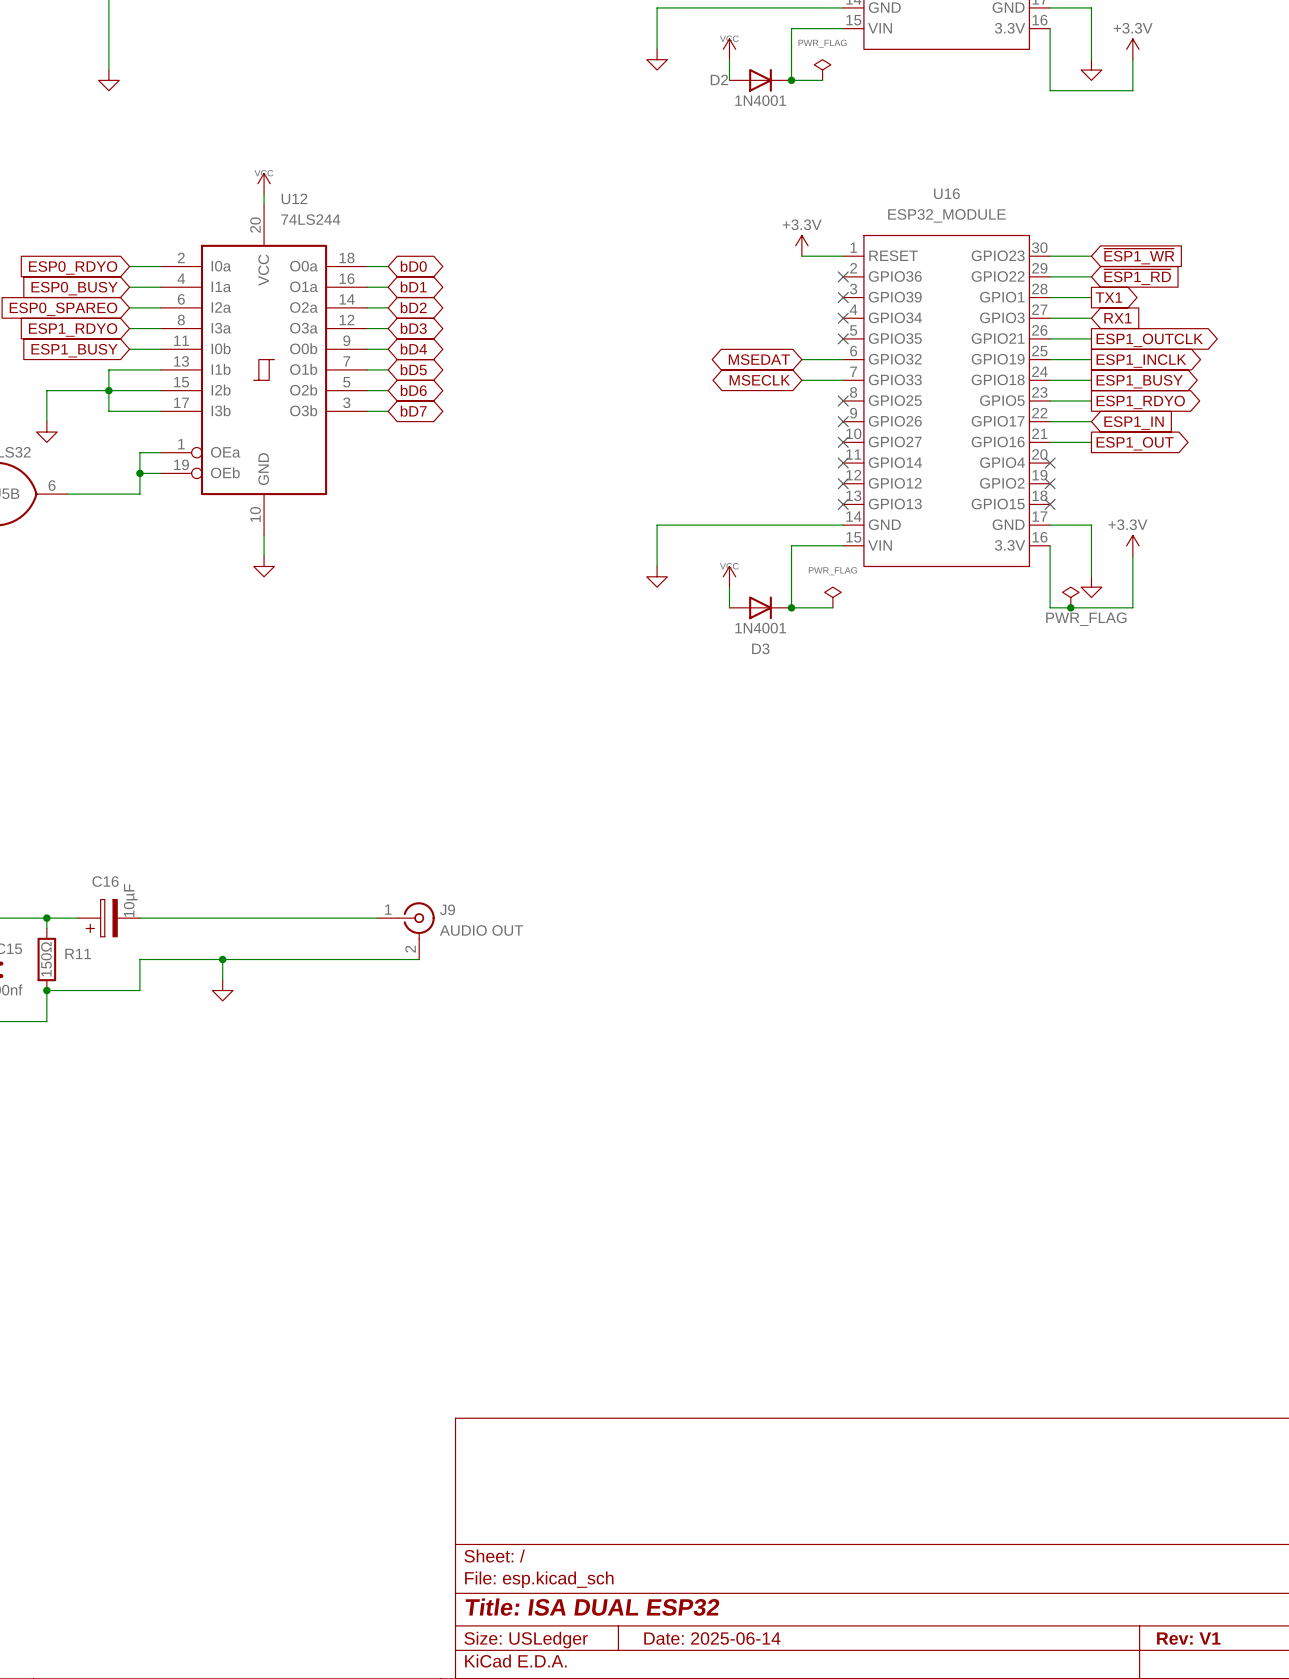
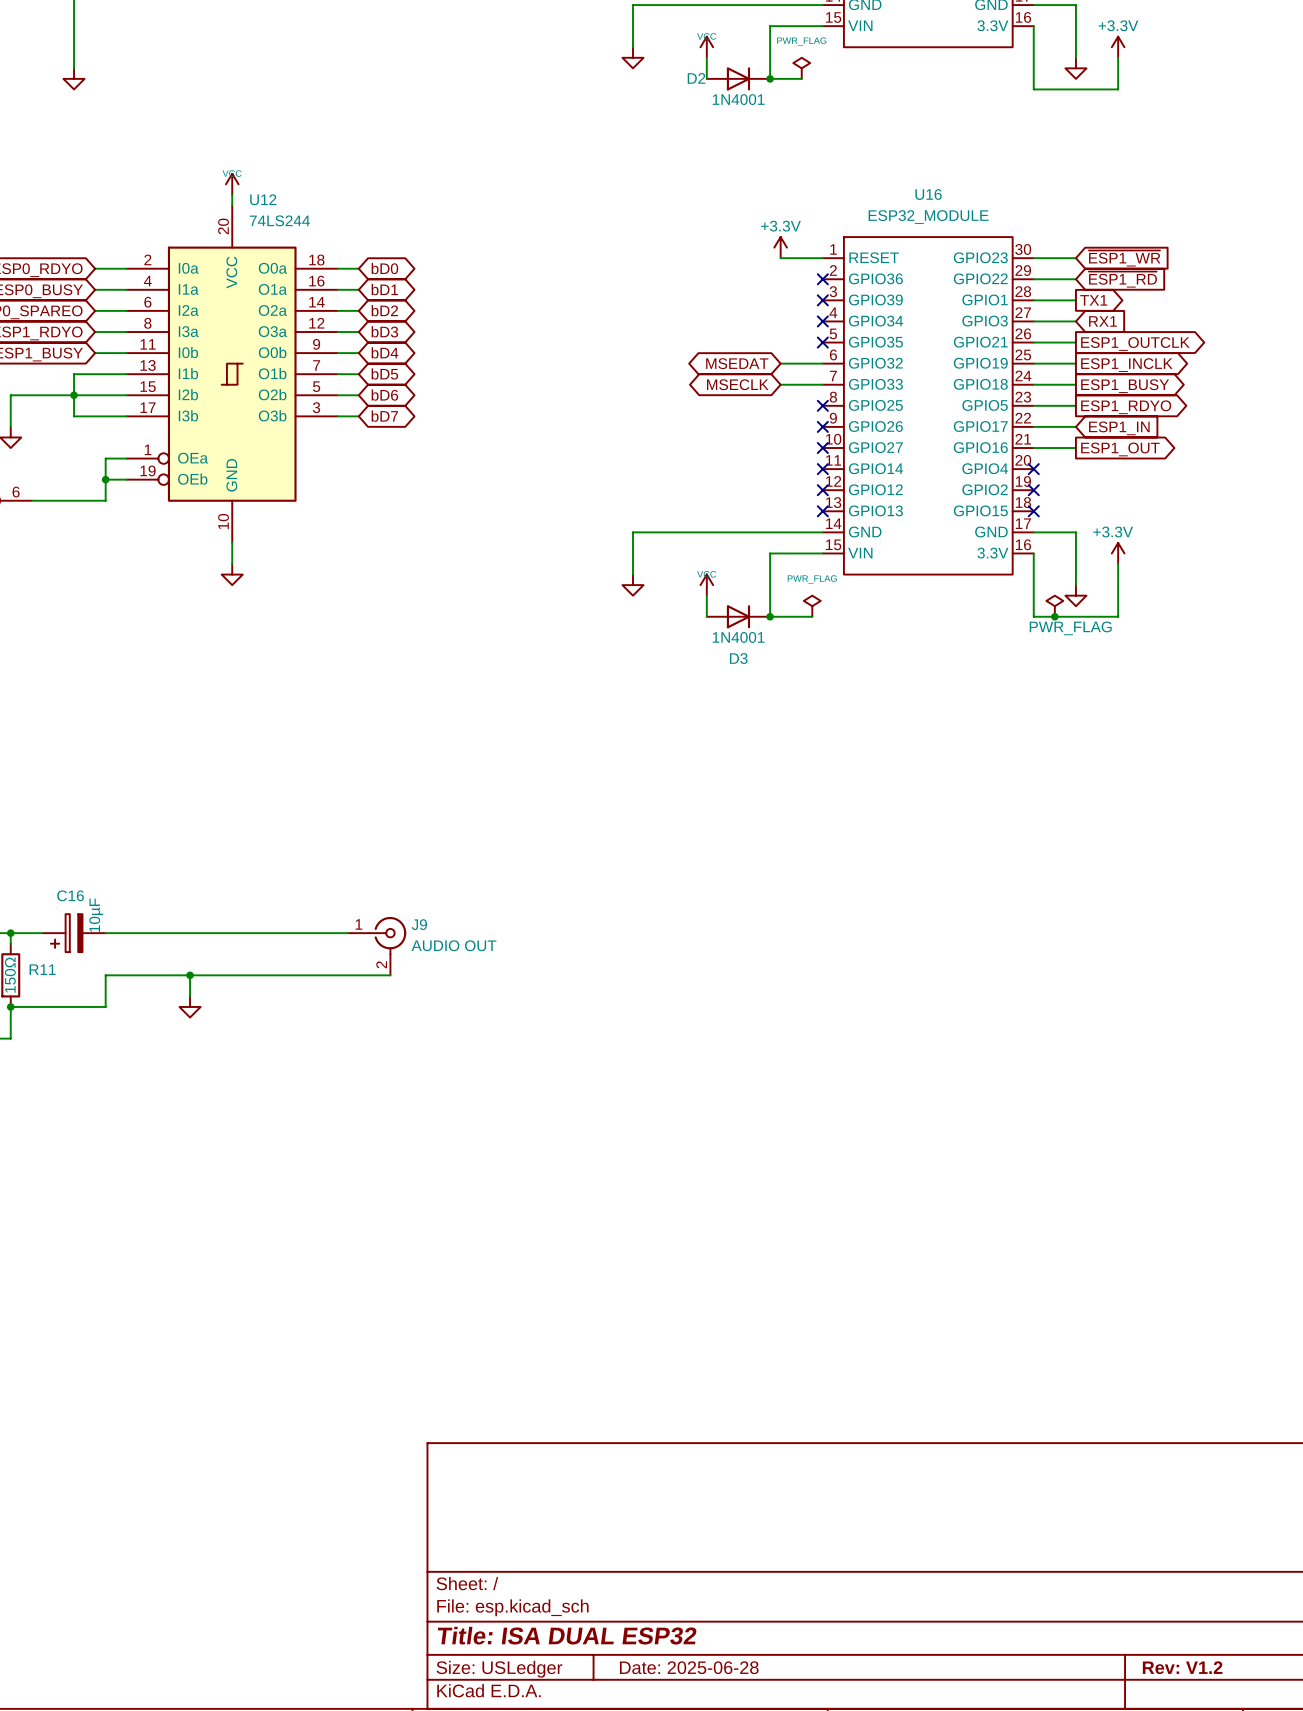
title block: Date: 2025-06-14 (712, 1638) -> Date: 2025-06-28 (689, 1667)
title block: Rev: V1 (1188, 1638) -> Rev: V1.2 (1182, 1667)

